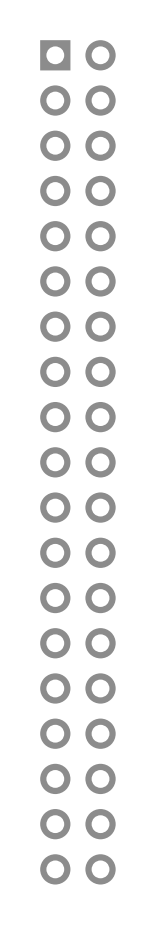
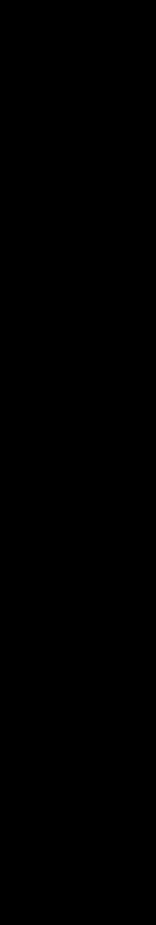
part: (77, 462) -> none

